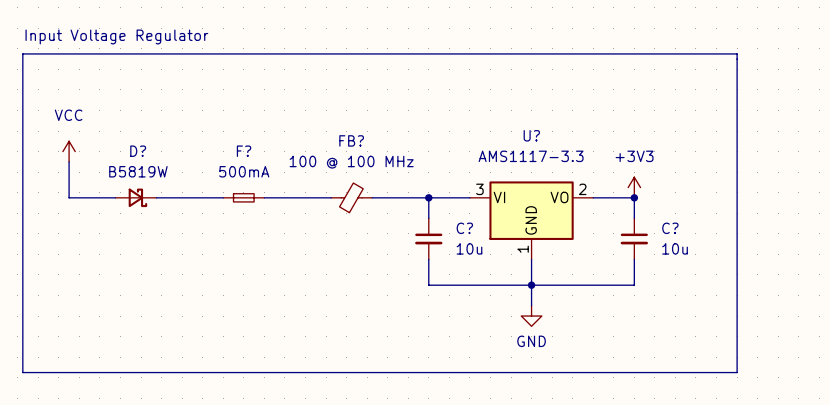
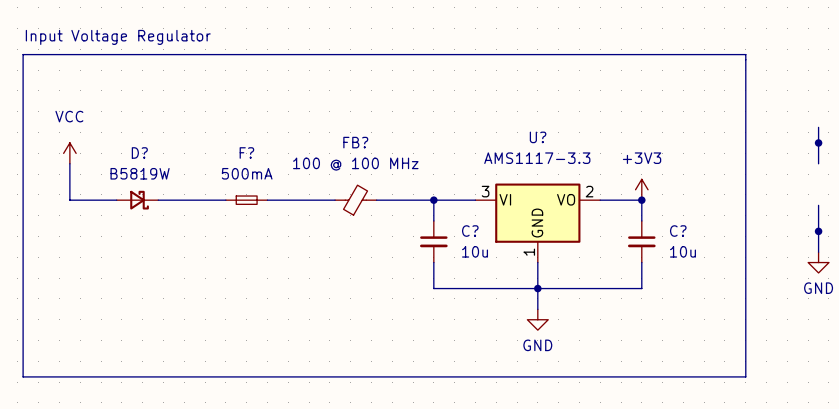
wire: none -> (818, 127) (818, 163)
junction: none -> (818, 142)
wire: none -> (818, 205) (818, 252)
junction: none -> (818, 231)
power symbol: none -> GND (818, 262)

